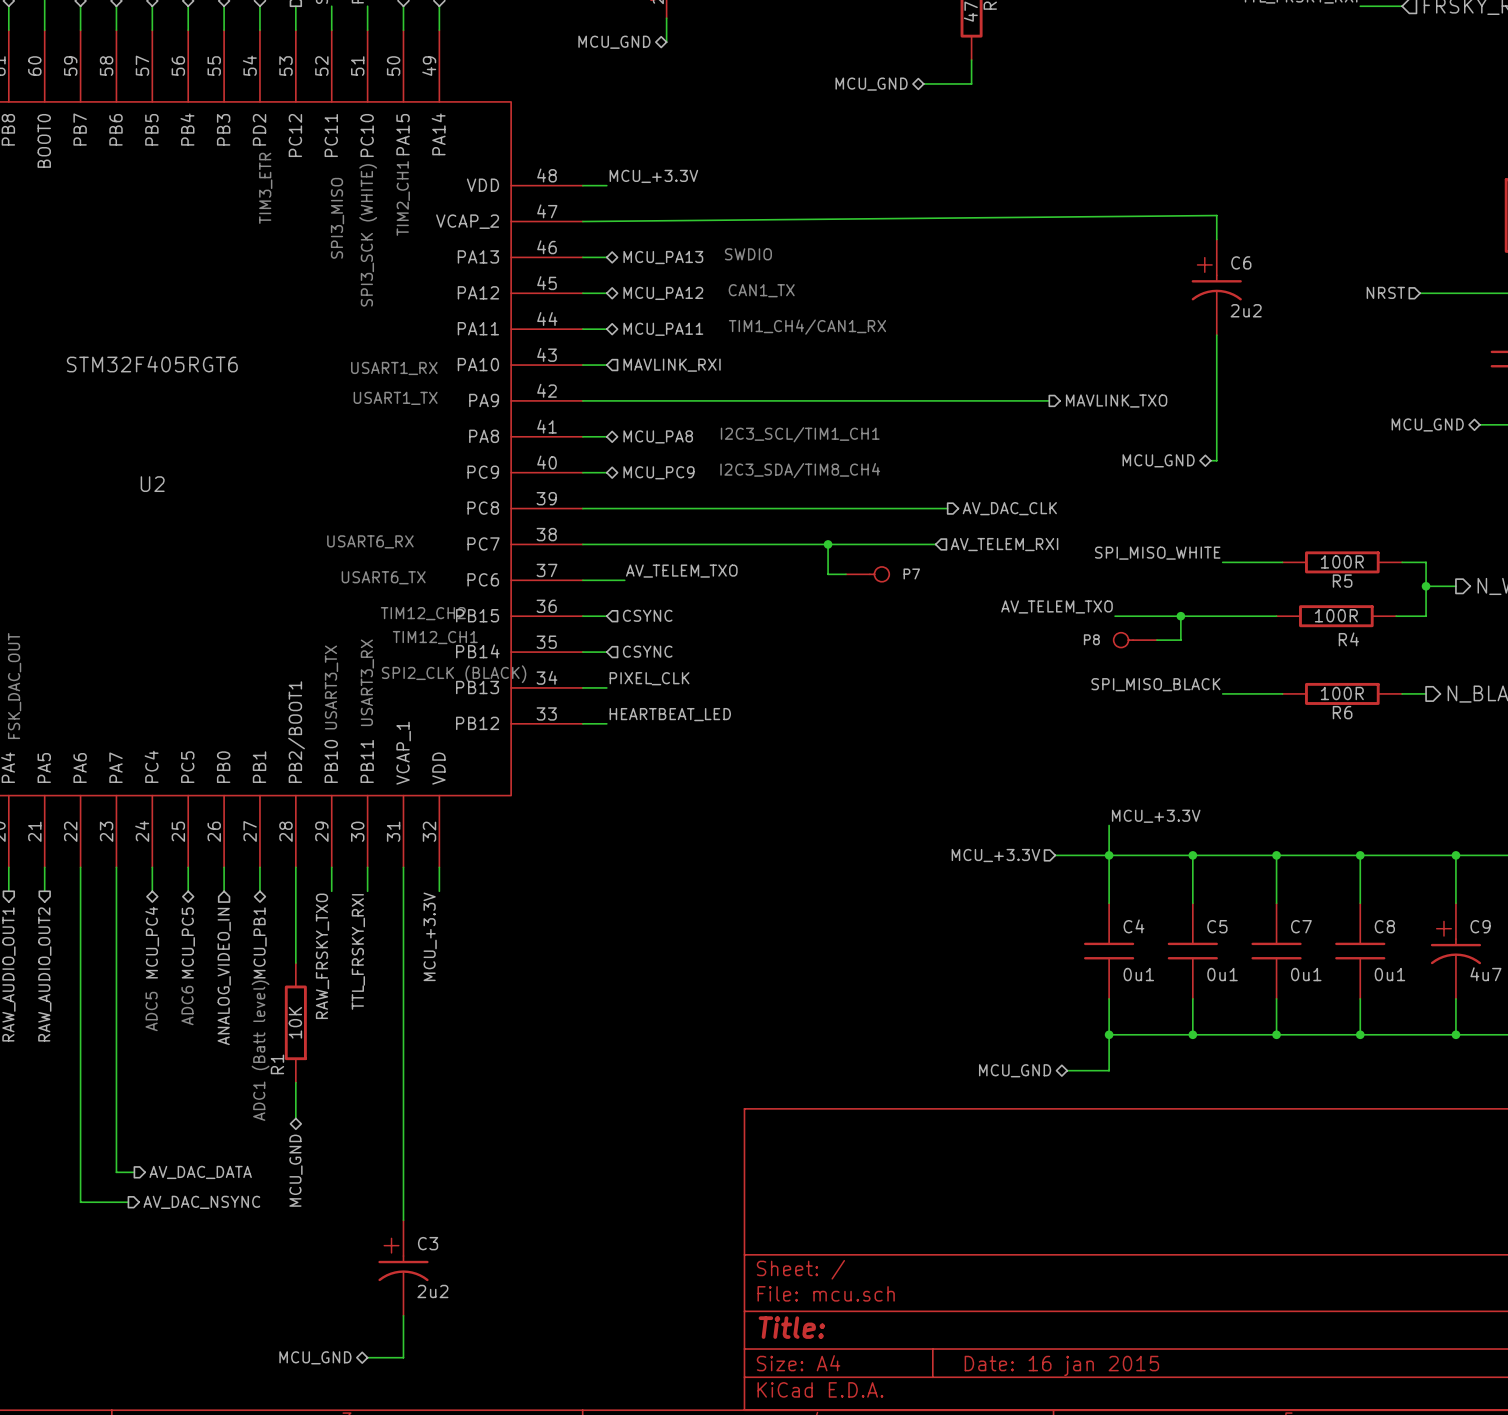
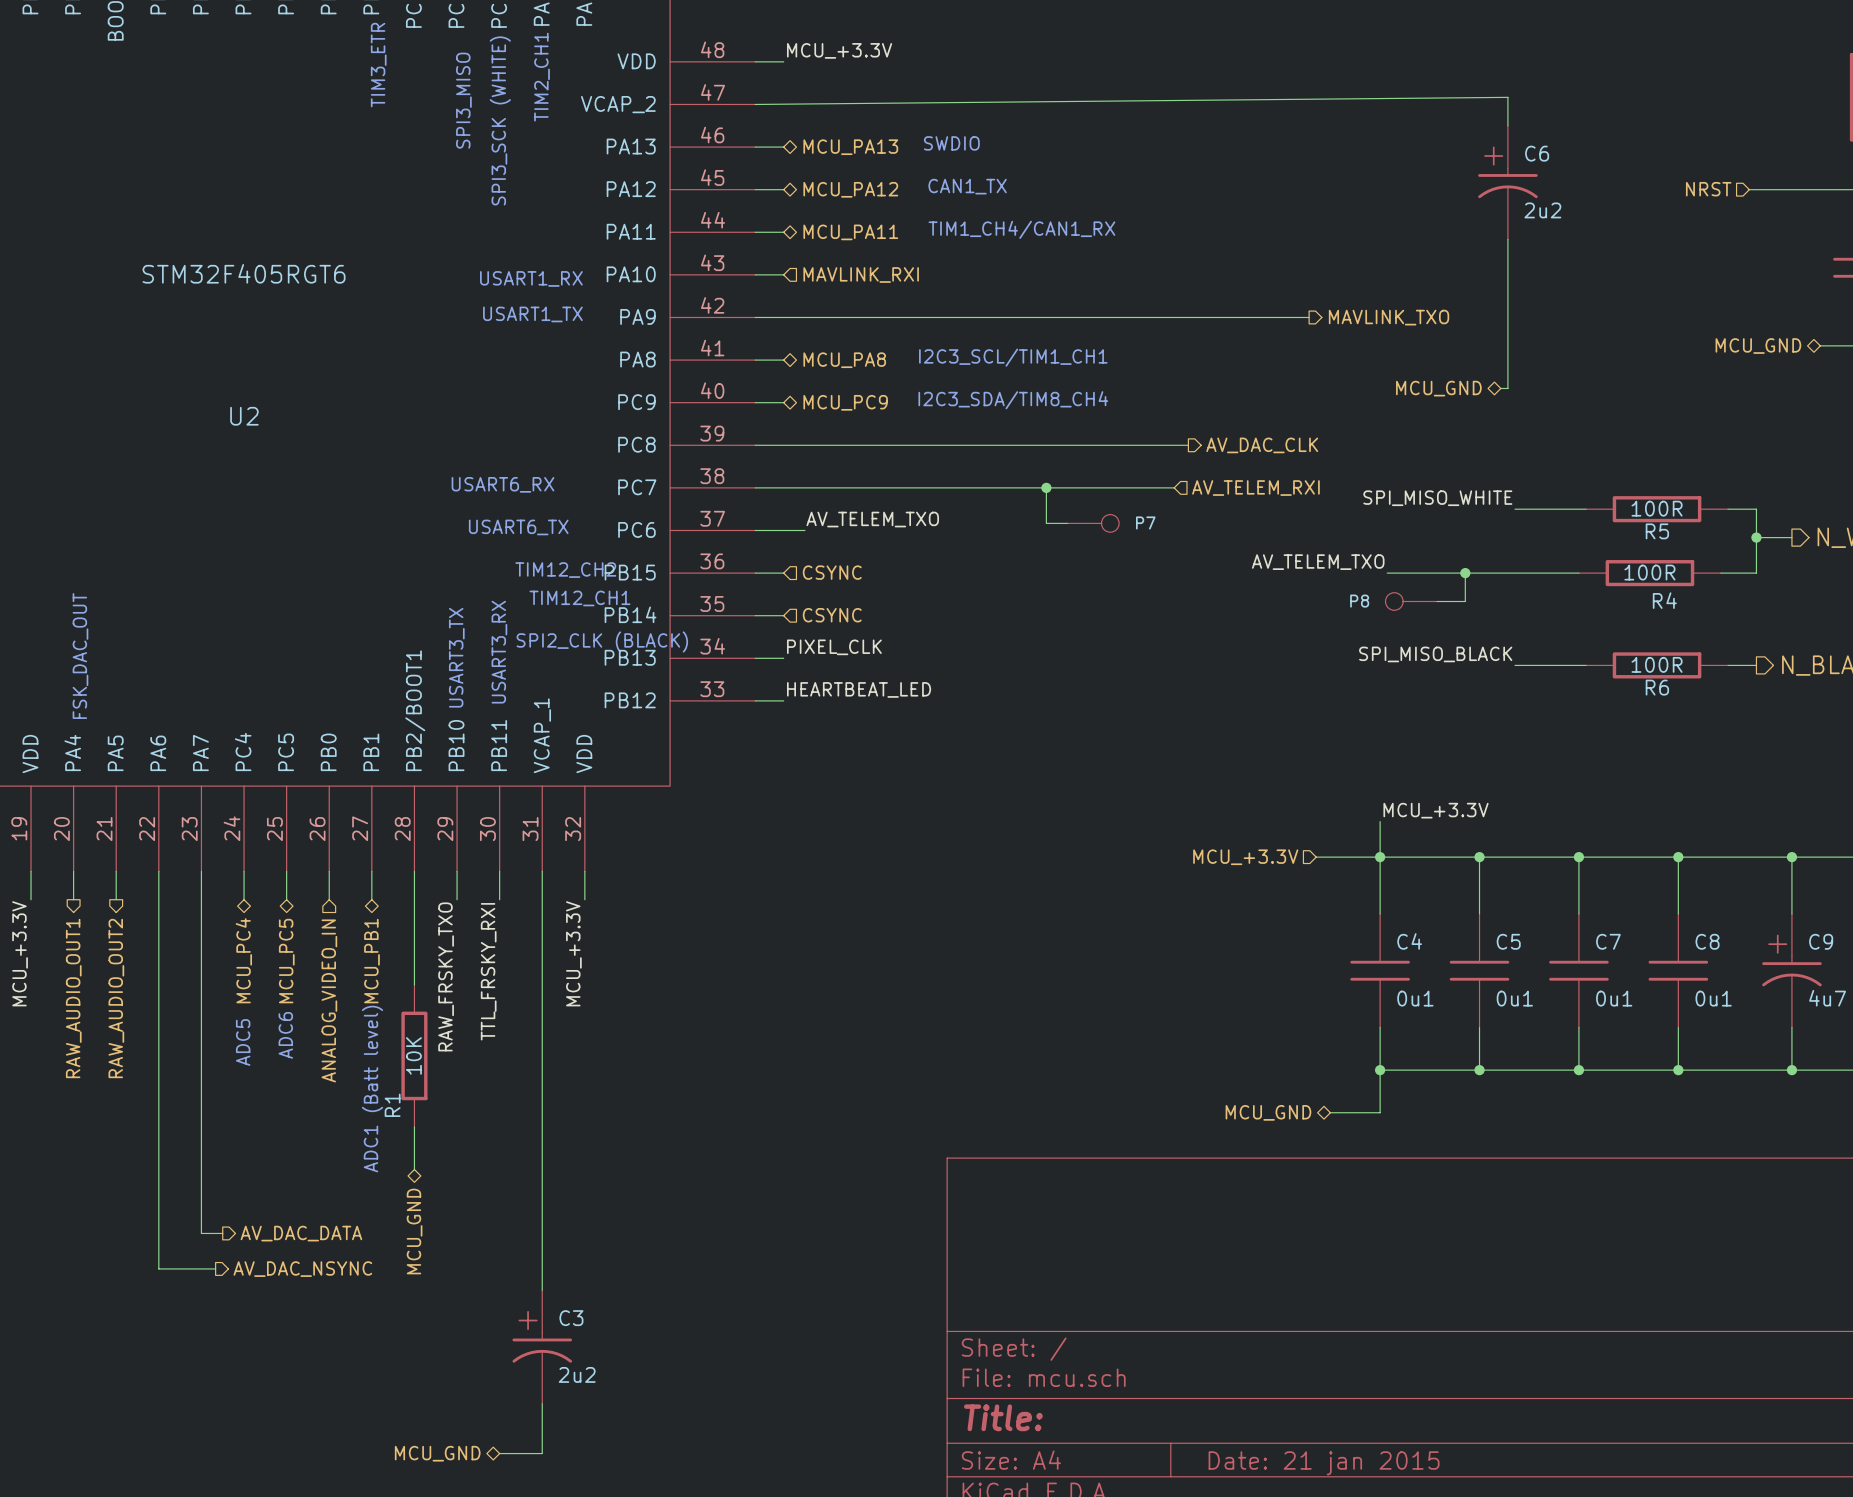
title block: Date: 16 jan 2015 (1061, 1365) -> Date: 21 jan 2015 (1324, 1463)

